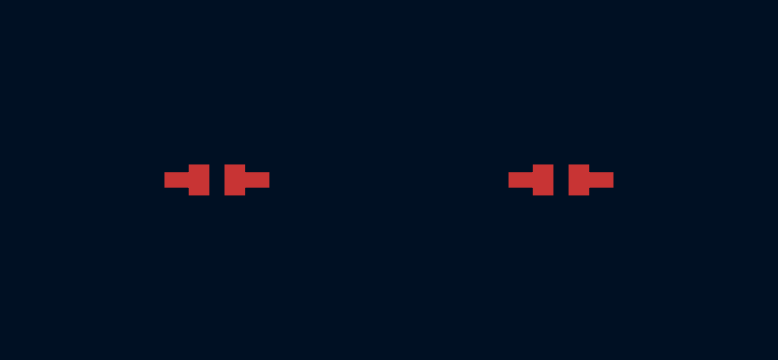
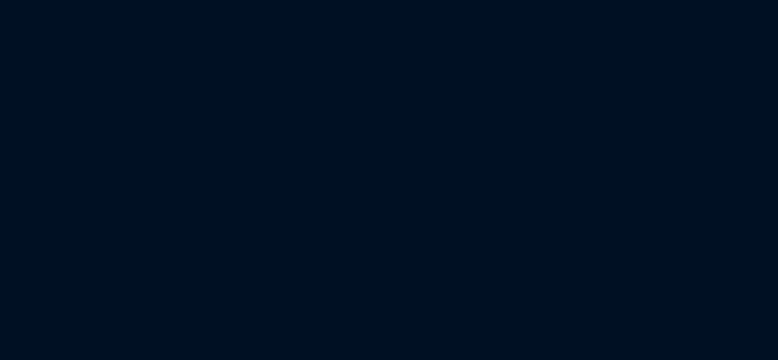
part: (216, 179) -> none
part: (216, 179) -> none
part: (561, 179) -> none
part: (561, 179) -> none

